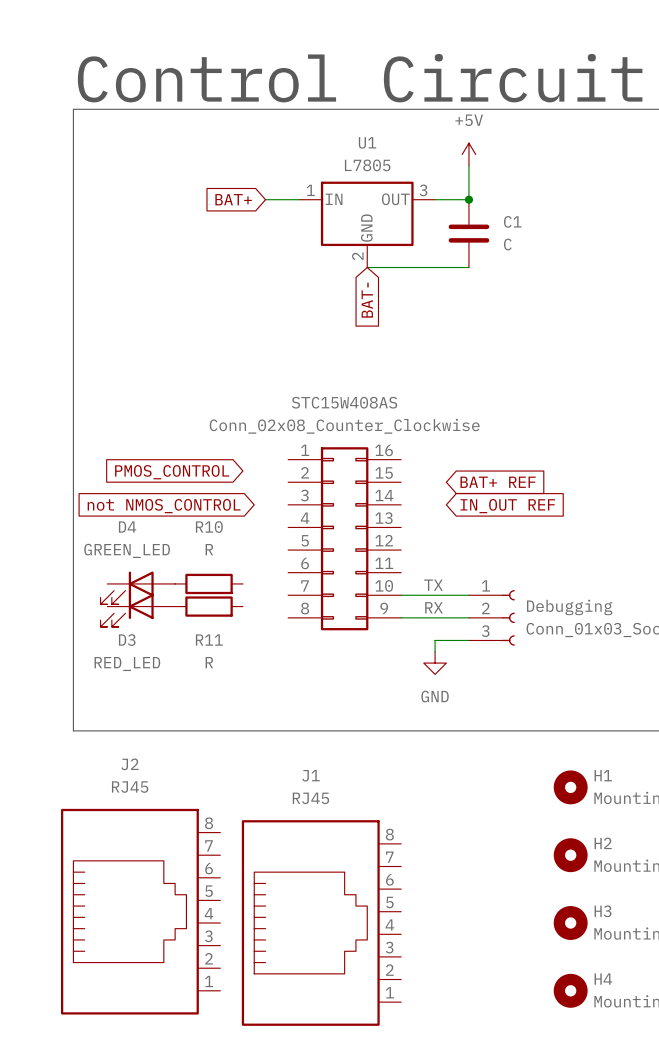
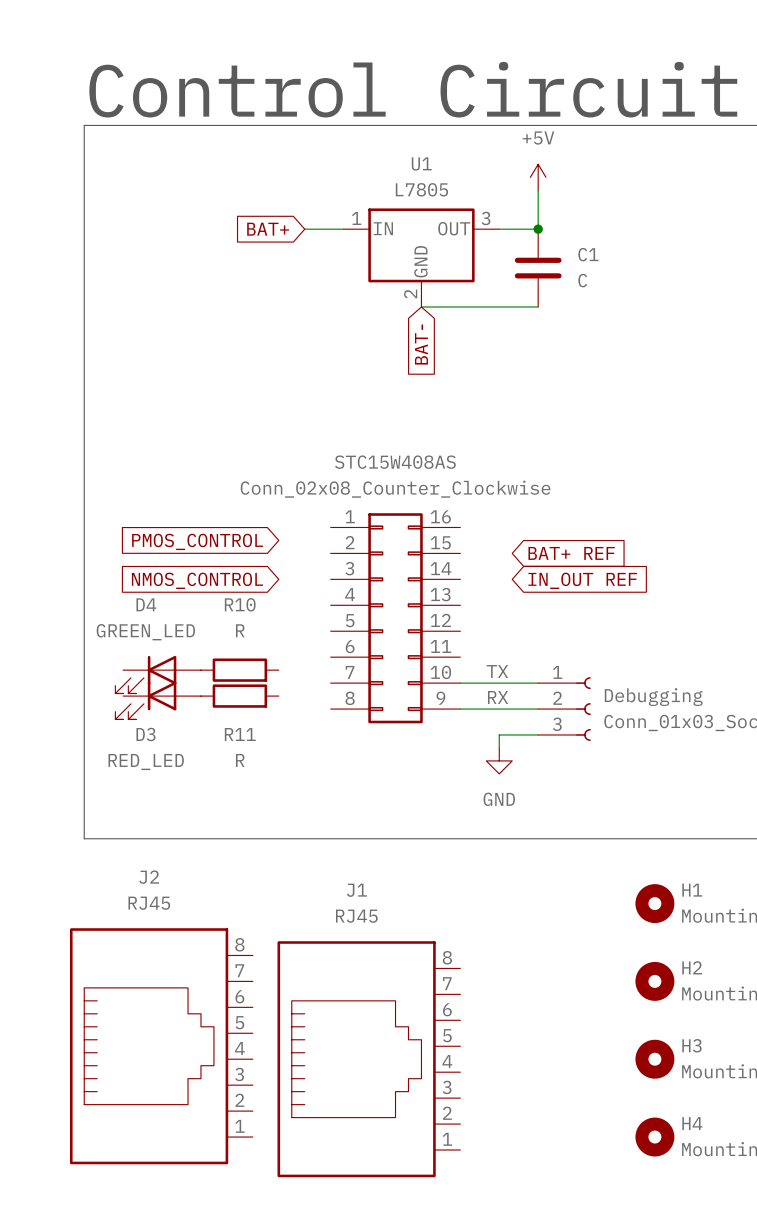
global label: not NMOS_CONTROL (164, 506) -> NMOS_CONTROL (197, 580)

